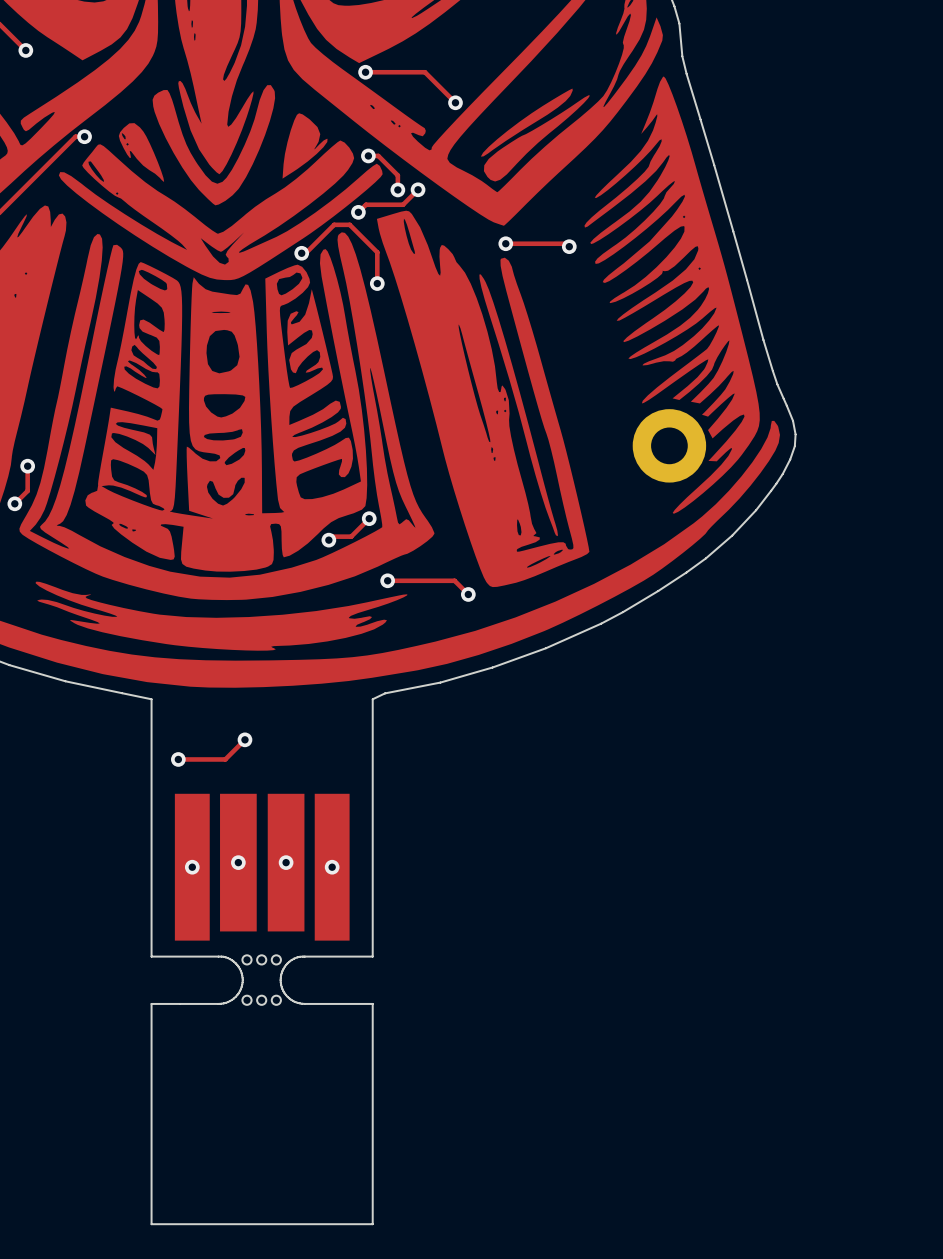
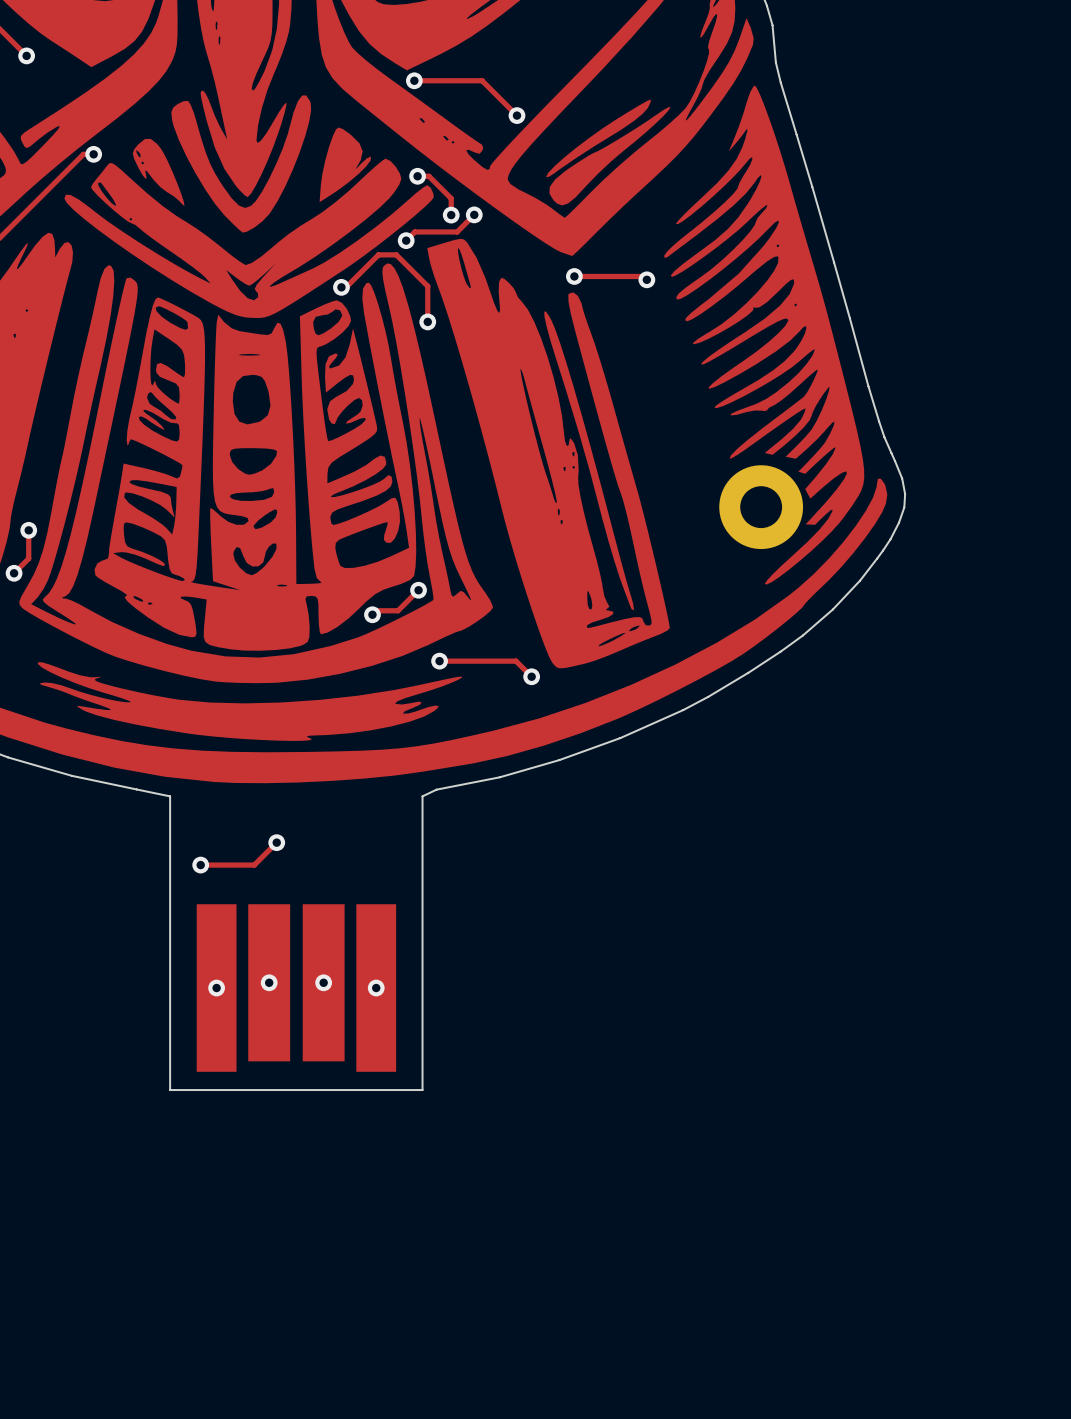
board edge: (221, 956) (235, 963) (242, 975) (240, 989) (231, 999) (218, 1003) (151, 1003) (151, 1224) (372, 1224) (372, 1003) (304, 1003) (291, 999) (282, 989) (281, 975) (289, 961) (302, 956) -> (249, 1090) (342, 1090)
part: (261, 980) -> none

